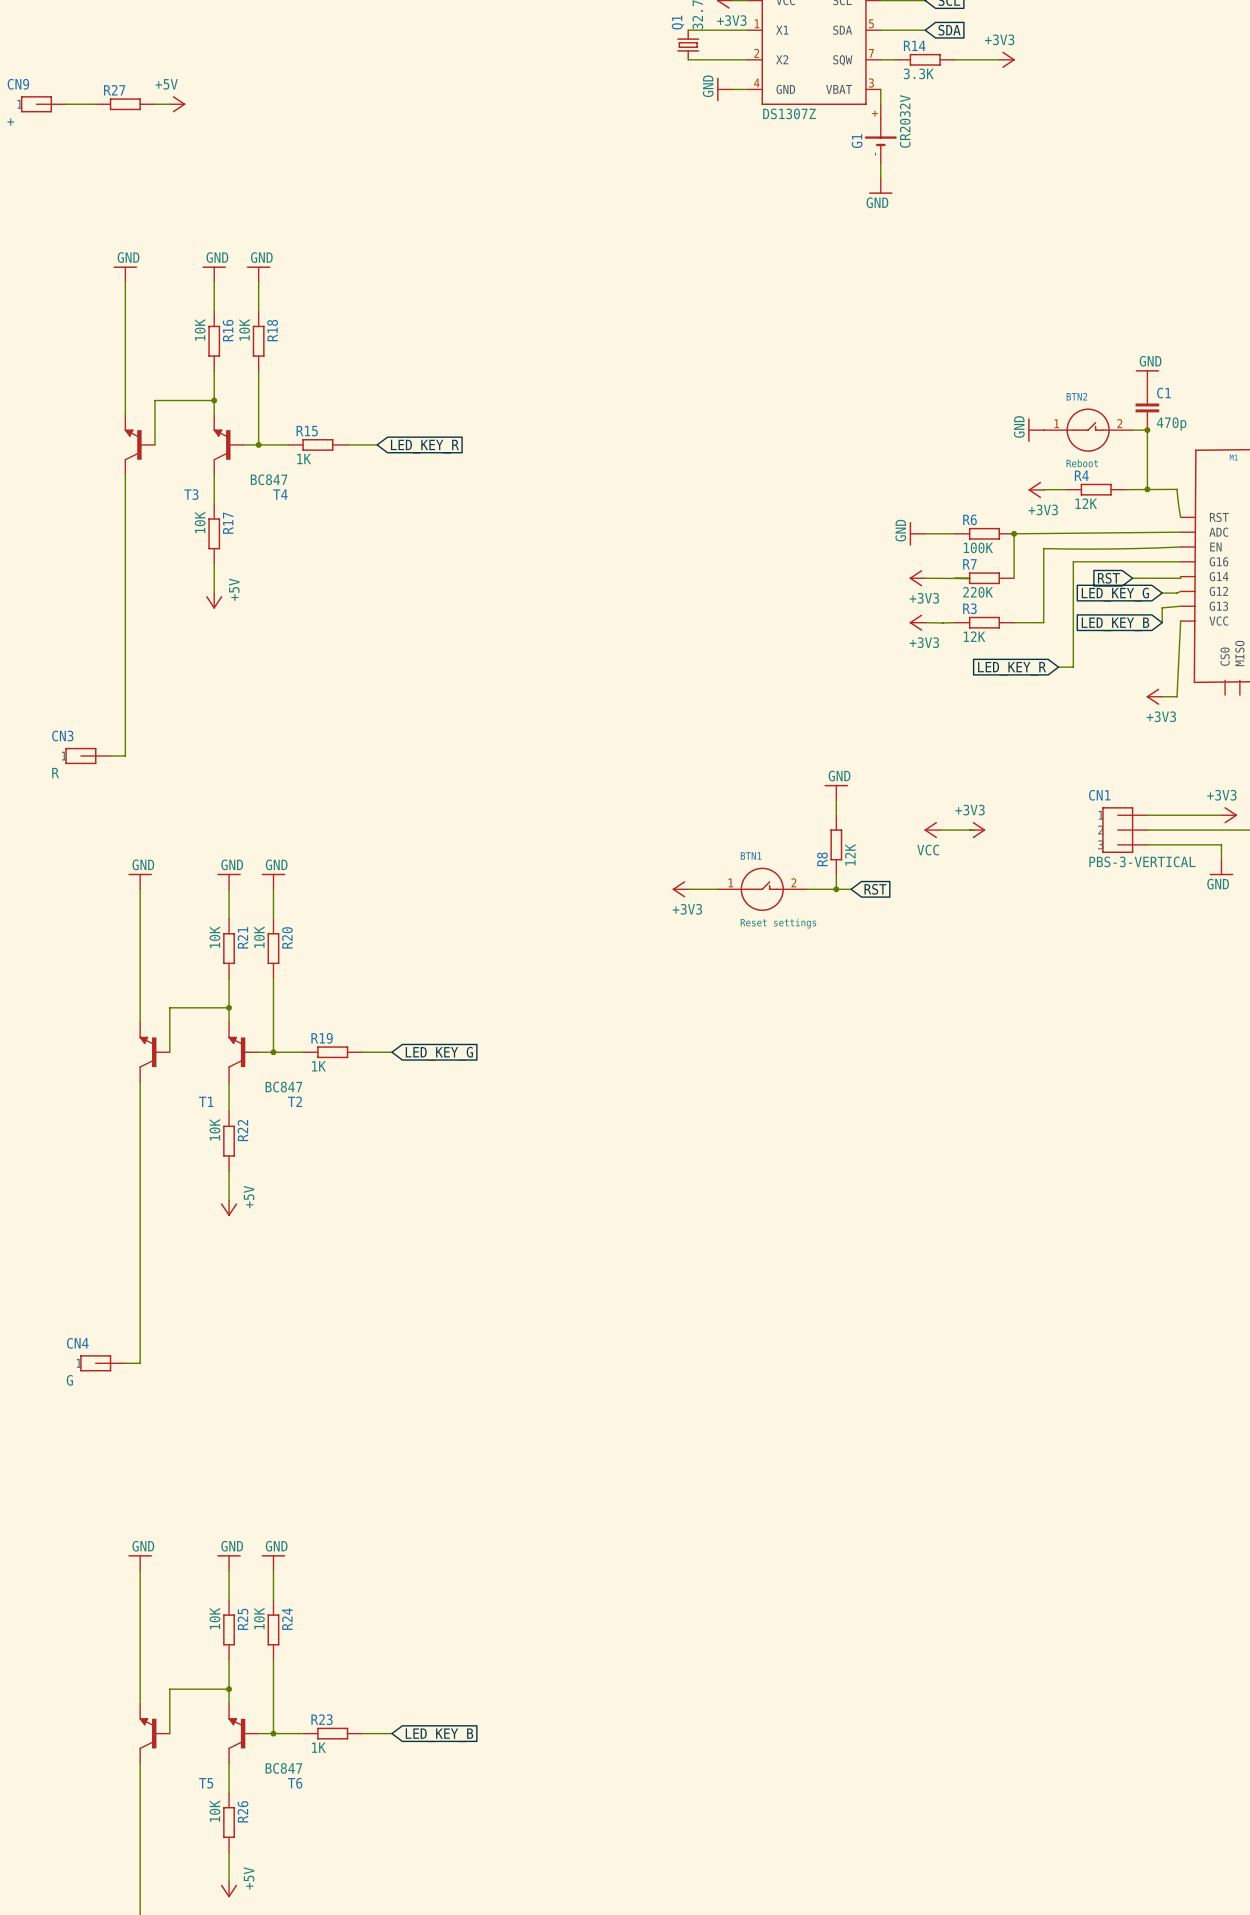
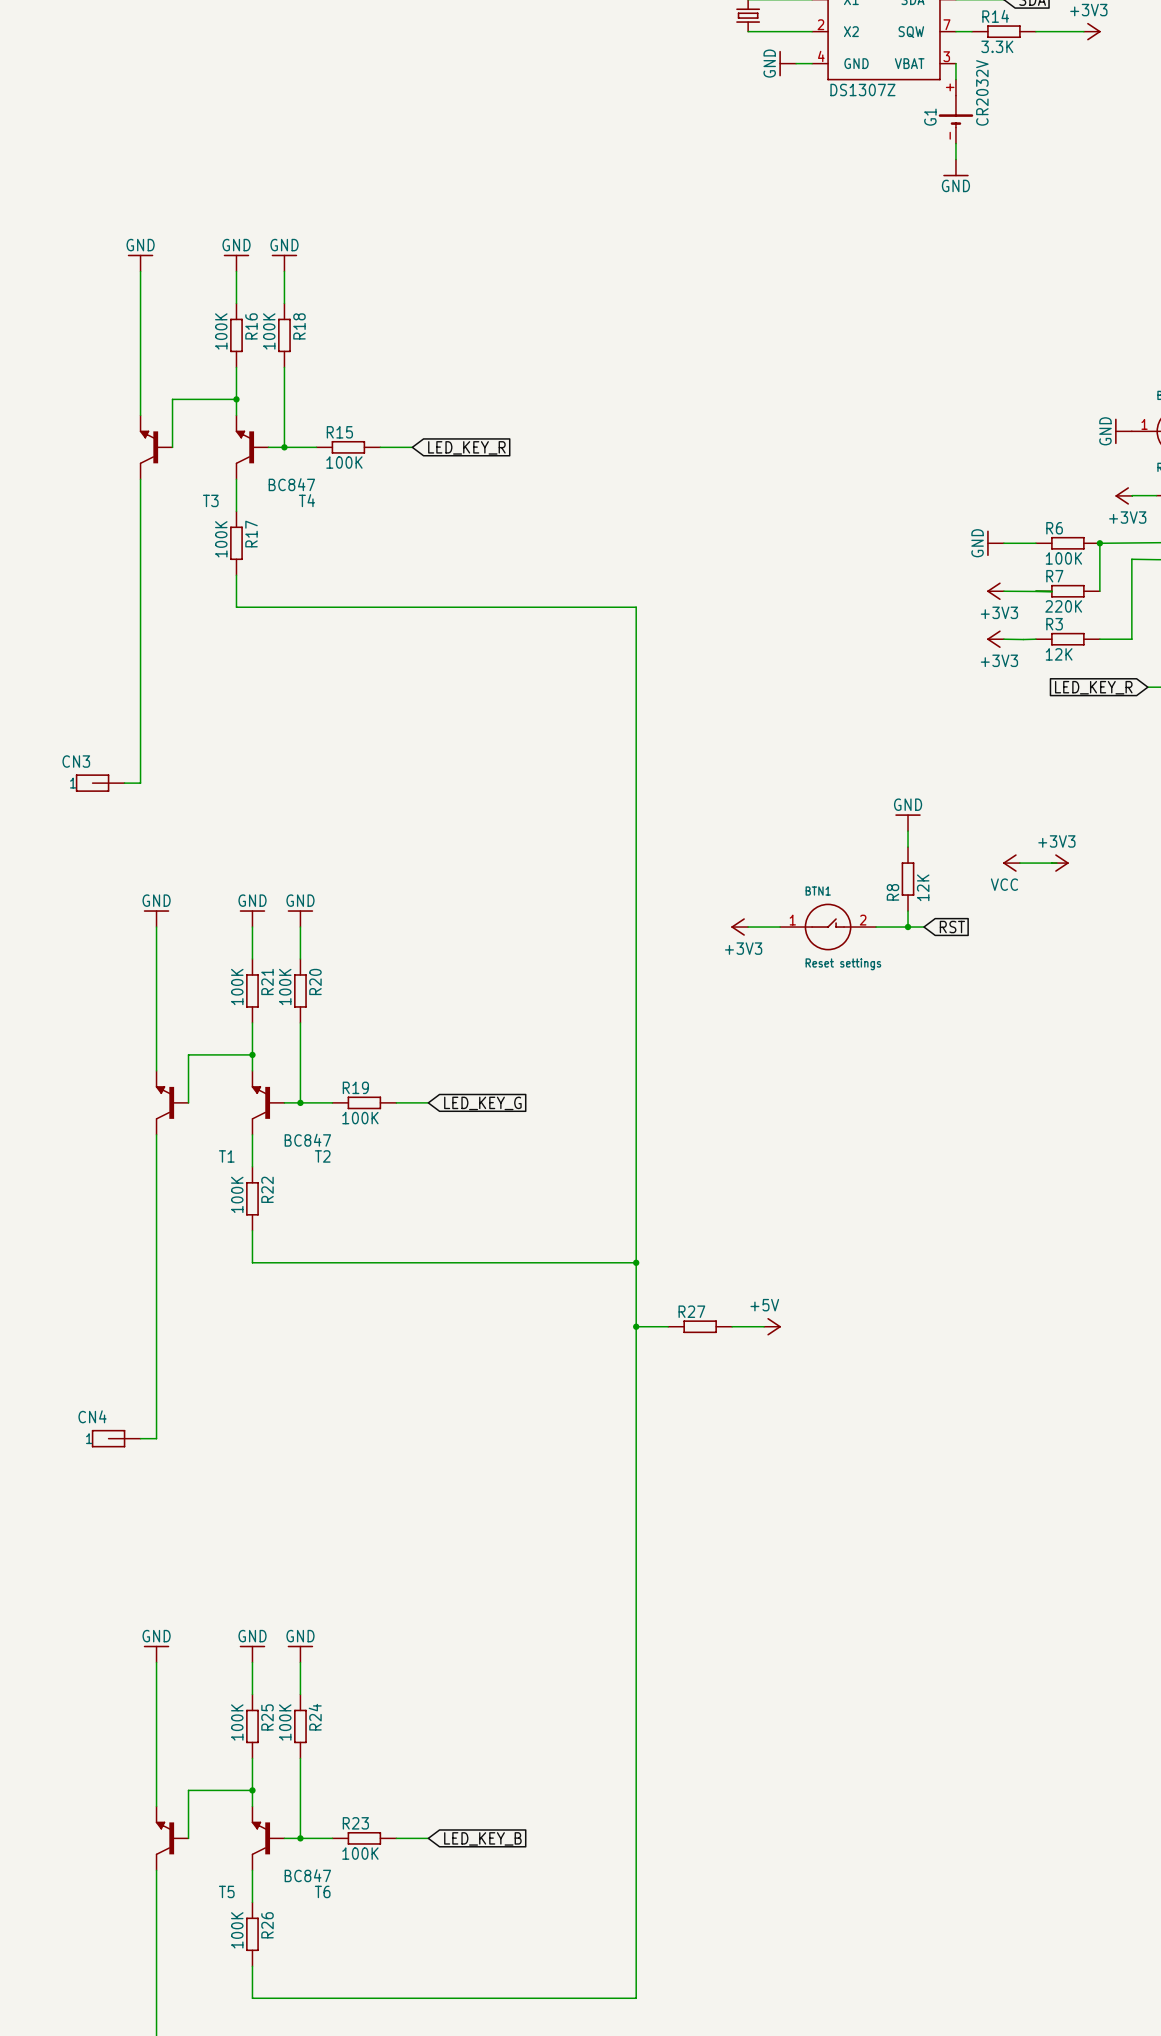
CN9: + (43, 104) -> none
wire: (66, 104) (95, 104) -> none
R27 position: (125, 104) -> (700, 1326)
wire: (154, 104) (169, 104) -> none
power symbol: +5V (177, 104) -> none
R16 value: 10K (200, 329) -> 100K (221, 331)
R18 value: 10K (244, 329) -> 100K (269, 331)
R15 value: 1K (304, 459) -> 100K (344, 462)
R17 value: 10K (200, 522) -> 100K (221, 539)
wire: none -> (236, 607) (636, 607) (636, 1998) (252, 1998)
power symbol: +5V (214, 600) -> none
CN3 value: R (55, 773) -> none
R21 value: 10K (214, 937) -> 100K (237, 987)
R20 value: 10K (259, 937) -> 100K (285, 987)
R19 value: 1K (318, 1066) -> 100K (360, 1118)
R22 value: 10K (214, 1129) -> 100K (237, 1194)
wire: none -> (252, 1262) (636, 1262)
junction: none -> (636, 1262)
power symbol: +5V (229, 1208) -> none
wire: none -> (636, 1326) (668, 1326)
junction: none -> (636, 1326)
wire: none -> (732, 1326) (764, 1326)
power symbol: none -> +5V (772, 1326)
CN4 value: G (69, 1380) -> none
R25 value: 10K (214, 1618) -> 100K (237, 1722)
R24 value: 10K (259, 1618) -> 100K (285, 1722)
R23 value: 1K (318, 1747) -> 100K (360, 1853)
R26 value: 10K (214, 1811) -> 100K (237, 1930)
power symbol: +5V (229, 1889) -> none

